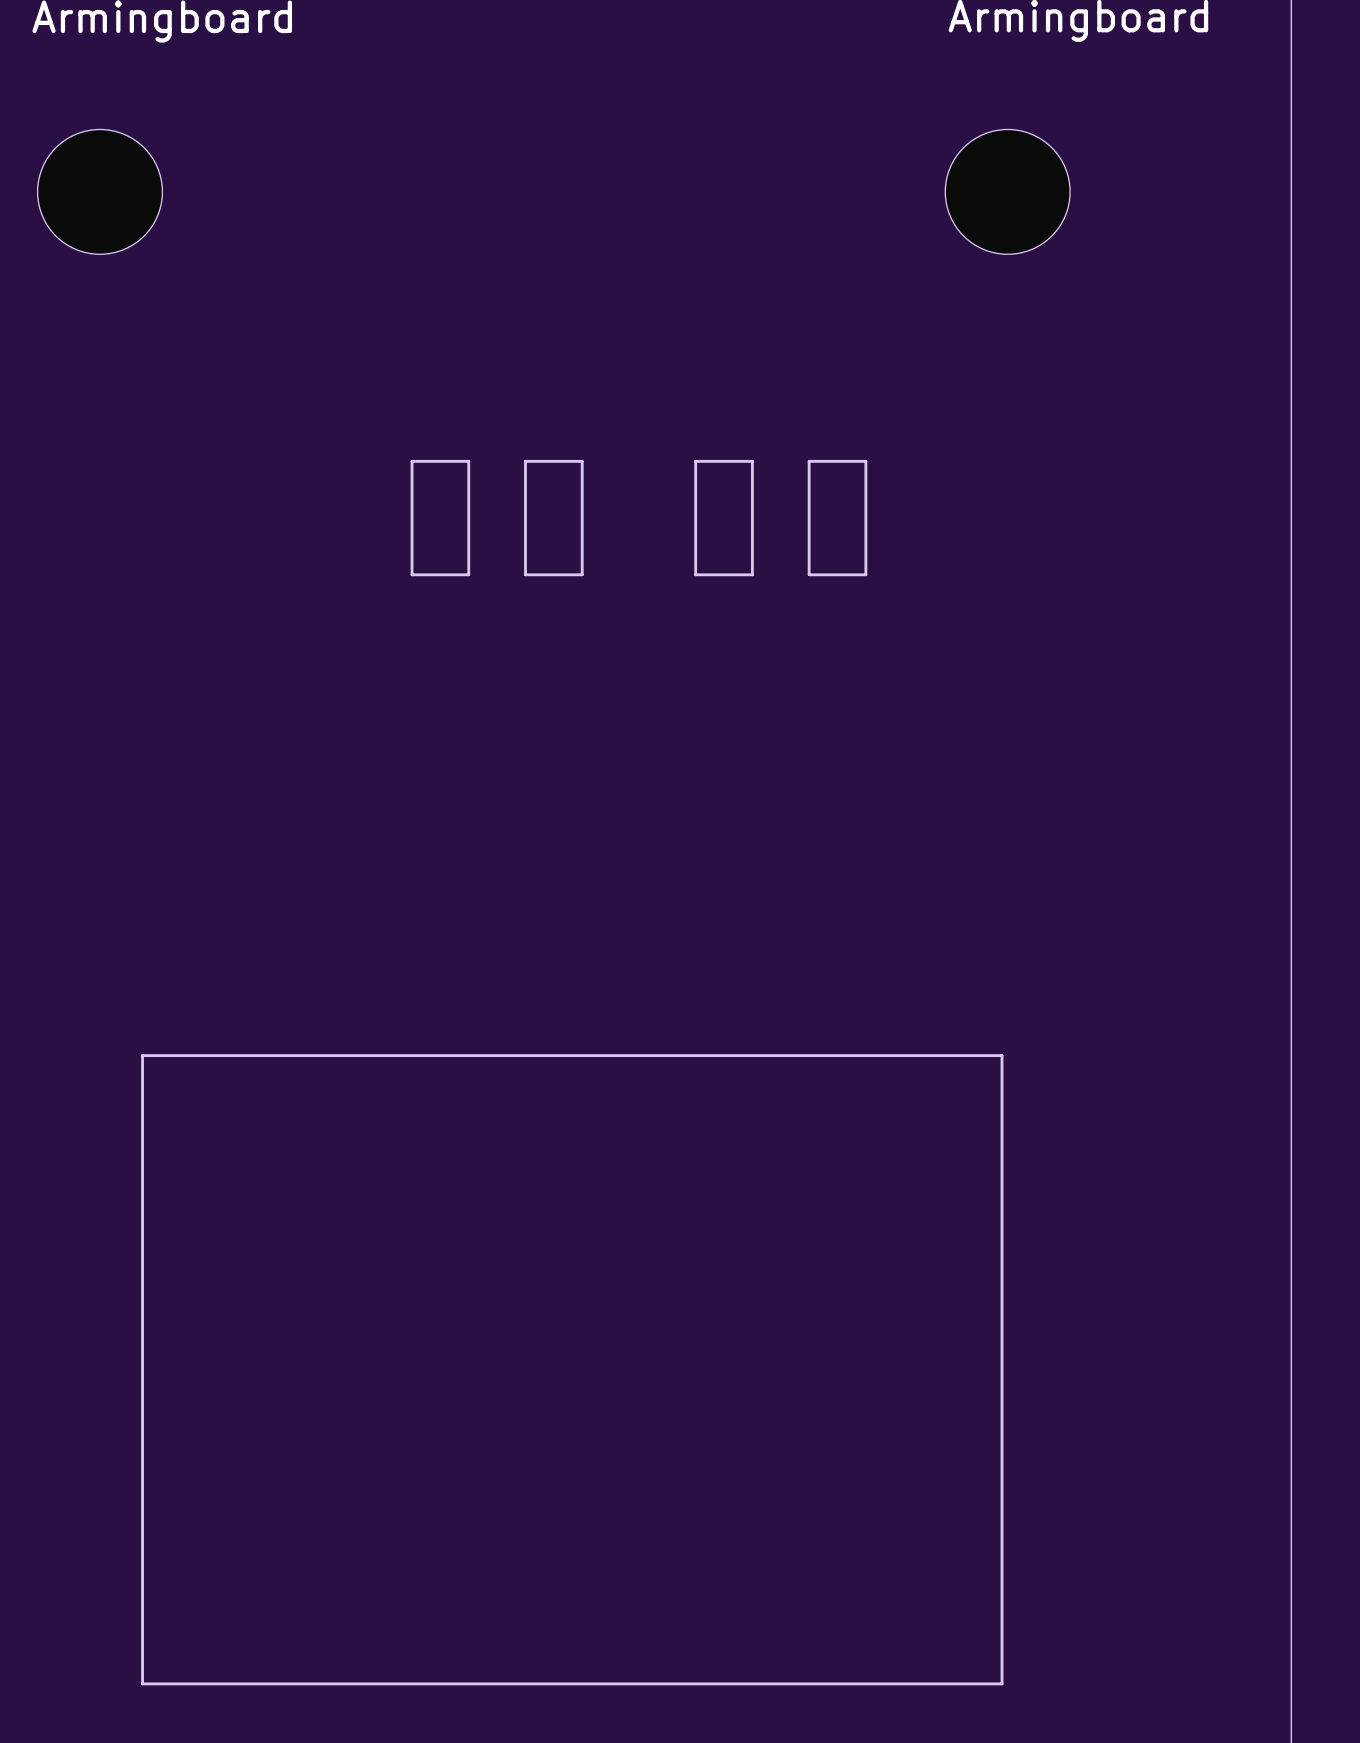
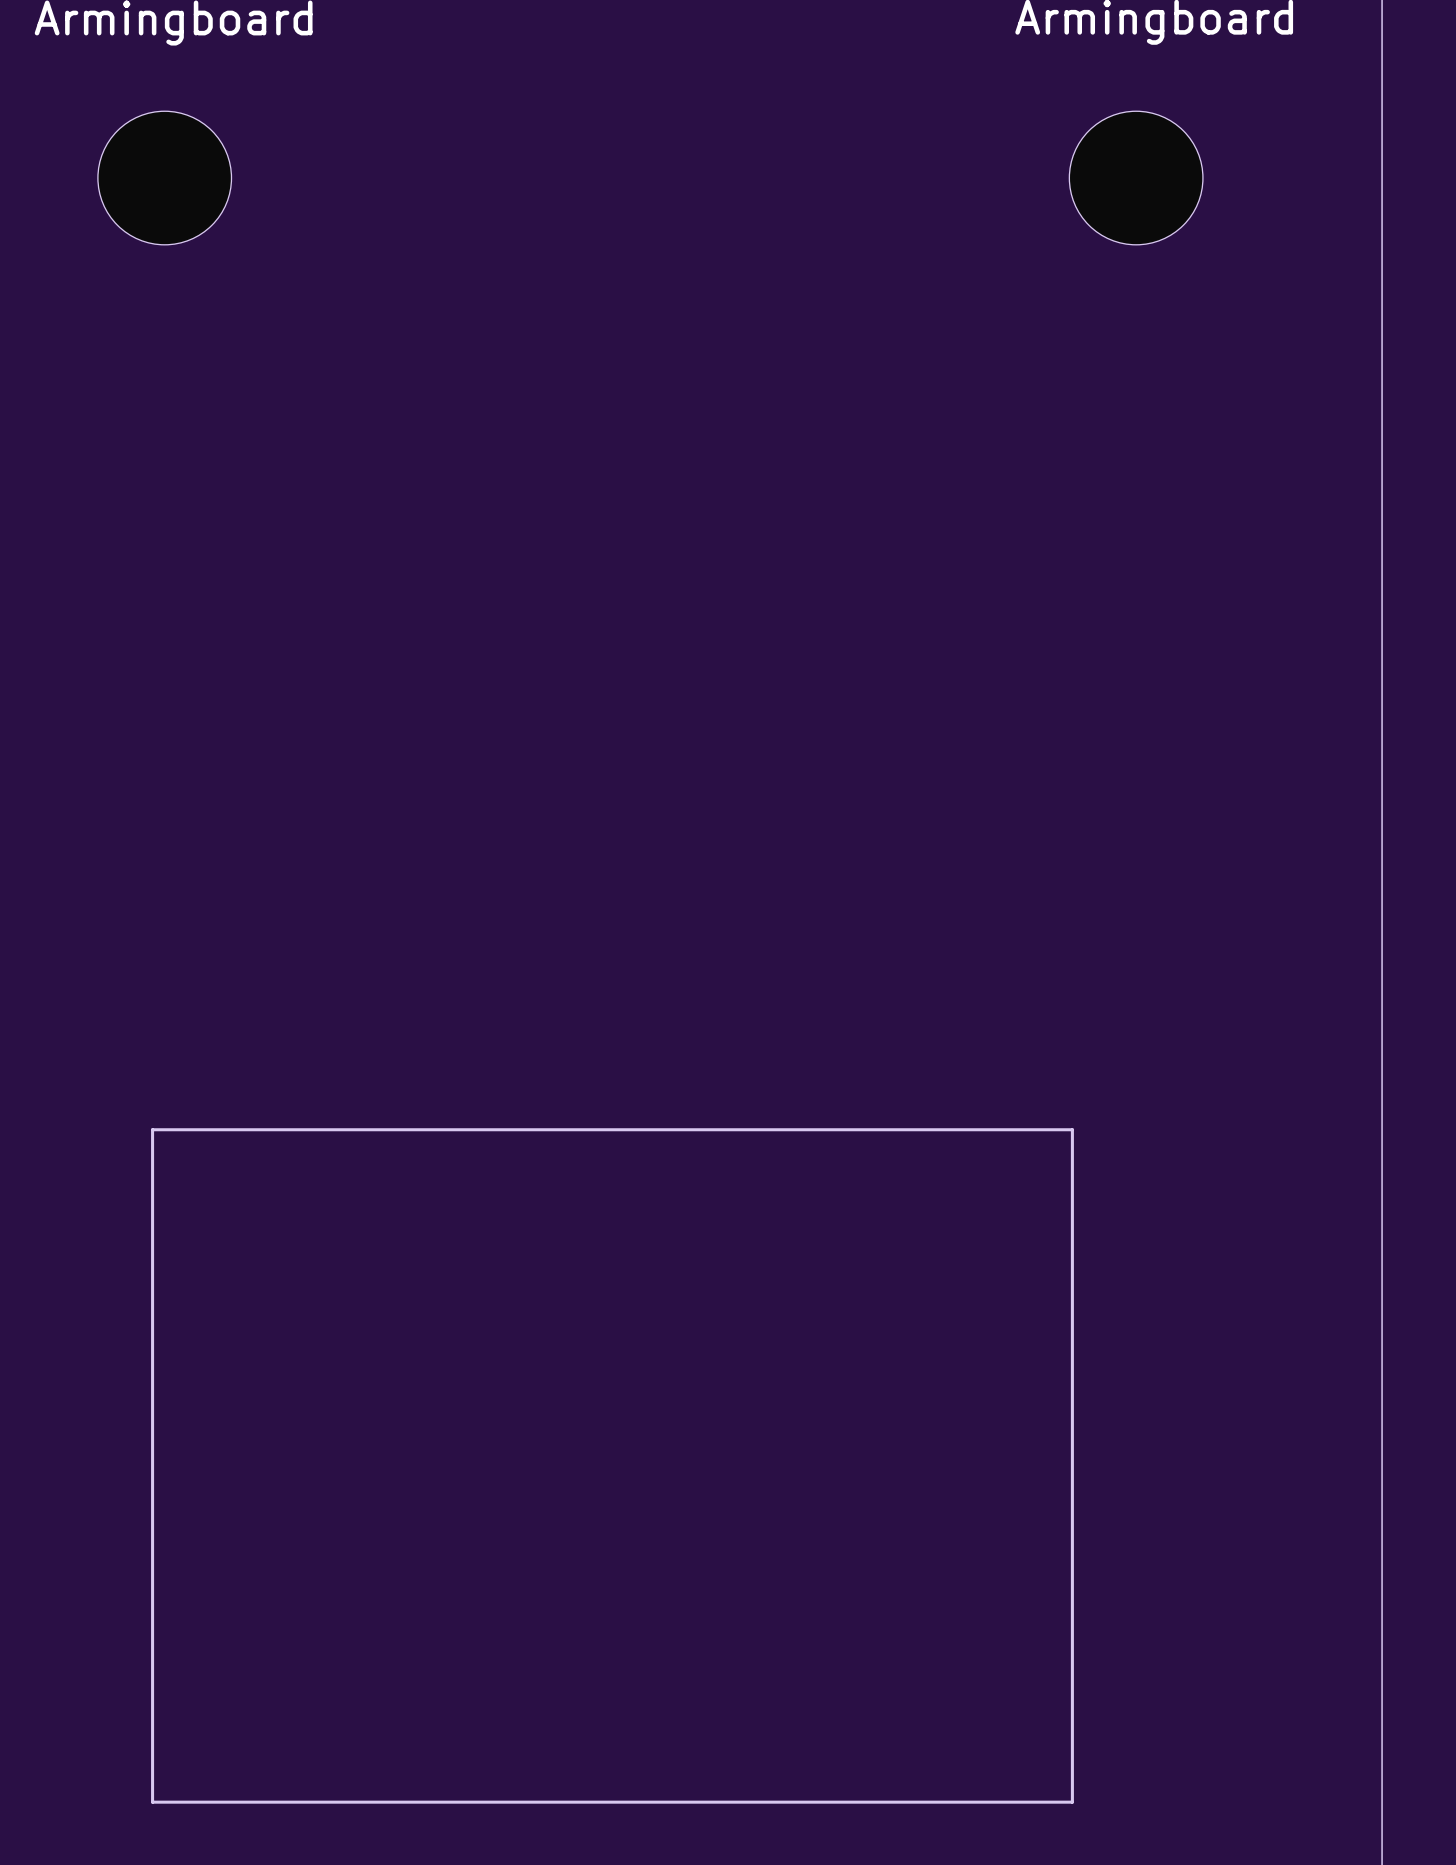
part position: (100, 191) -> (164, 178)
part position: (1007, 191) -> (1136, 178)
board edge: (468, 461) (412, 461) (412, 574) (468, 574) (468, 461) -> none
board edge: (582, 461) (525, 461) (525, 574) (582, 574) (582, 461) -> none
board edge: (752, 461) (695, 461) (695, 574) (752, 574) (752, 461) -> none
board edge: (865, 461) (809, 461) (809, 574) (865, 574) (865, 461) -> none

